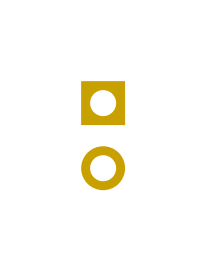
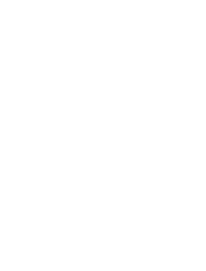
part: (103, 135) -> none

